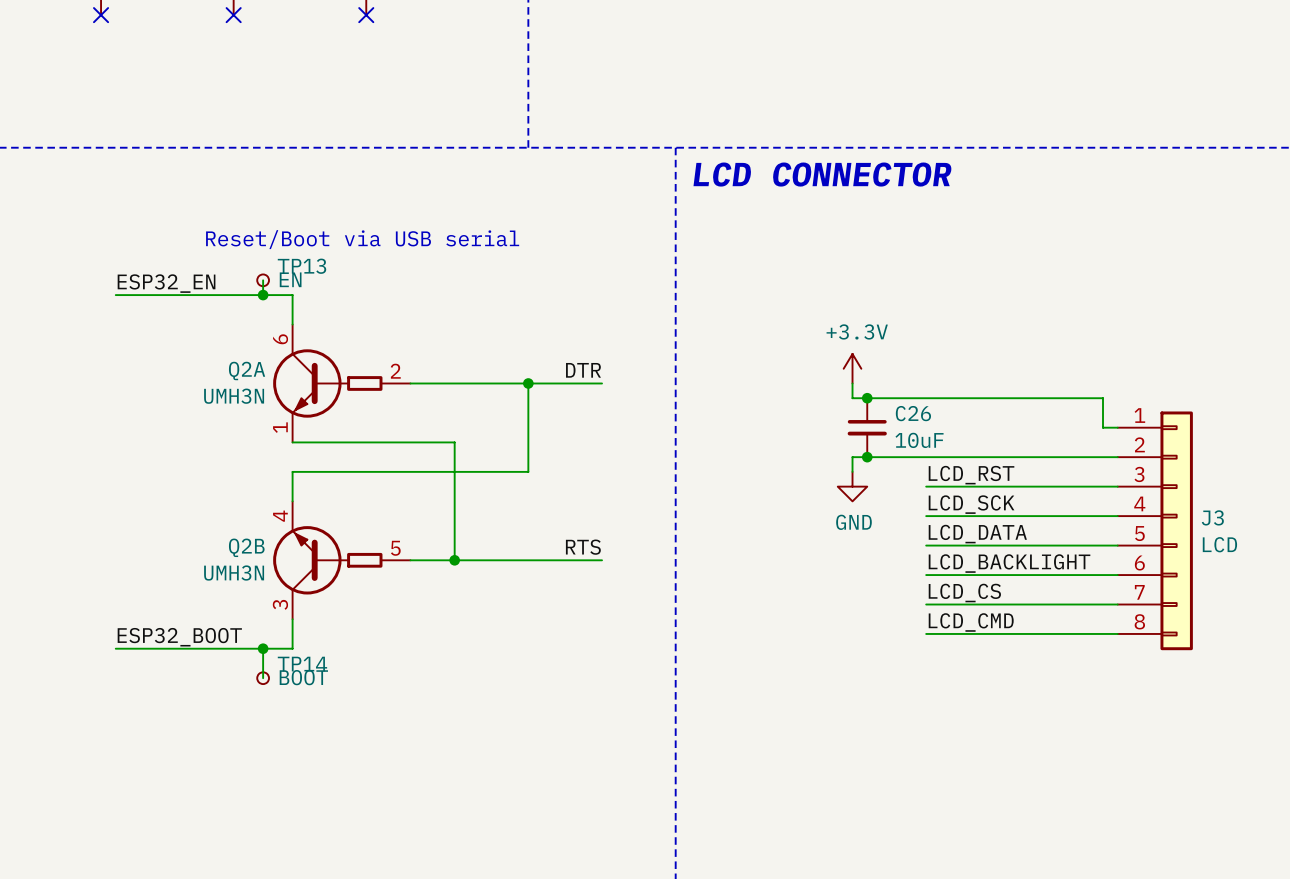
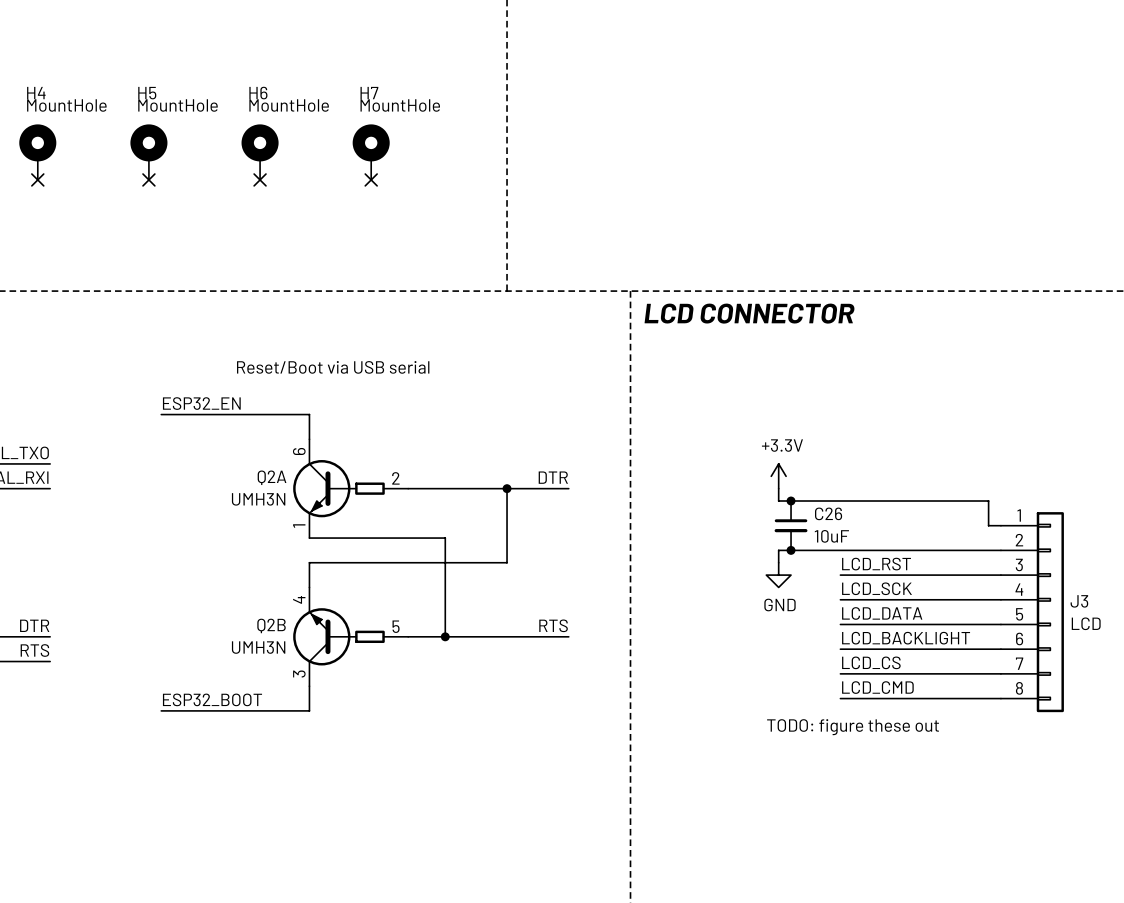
wire: (263, 280) (263, 295) -> none
TP13: EN (263, 280) -> none
junction: (263, 295) -> none
wire: (263, 648) (263, 678) -> none
junction: (263, 648) -> none
text: none -> TODO: figure these out (853, 727)
TP14: BOOT (263, 678) -> none

